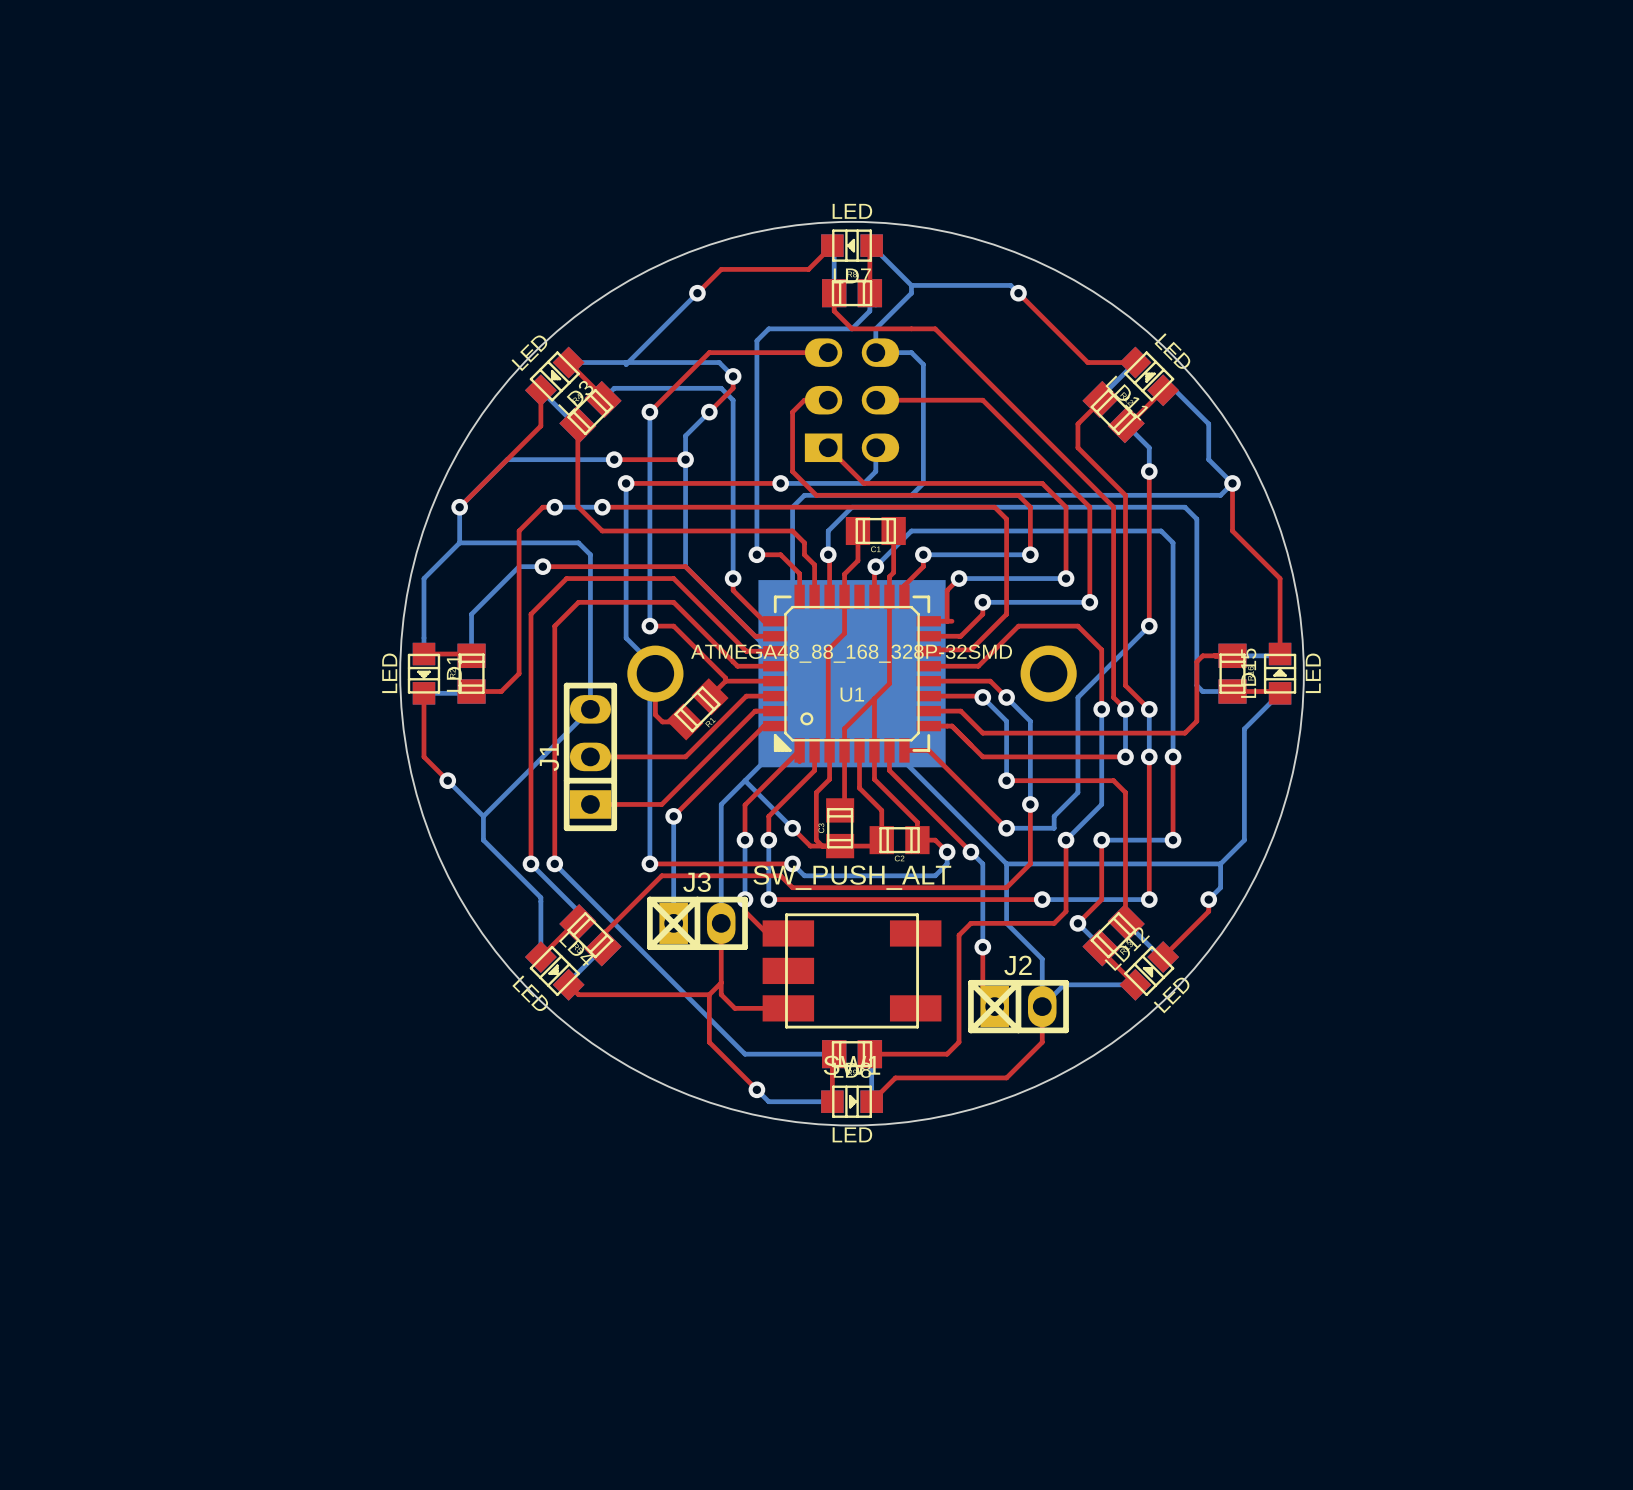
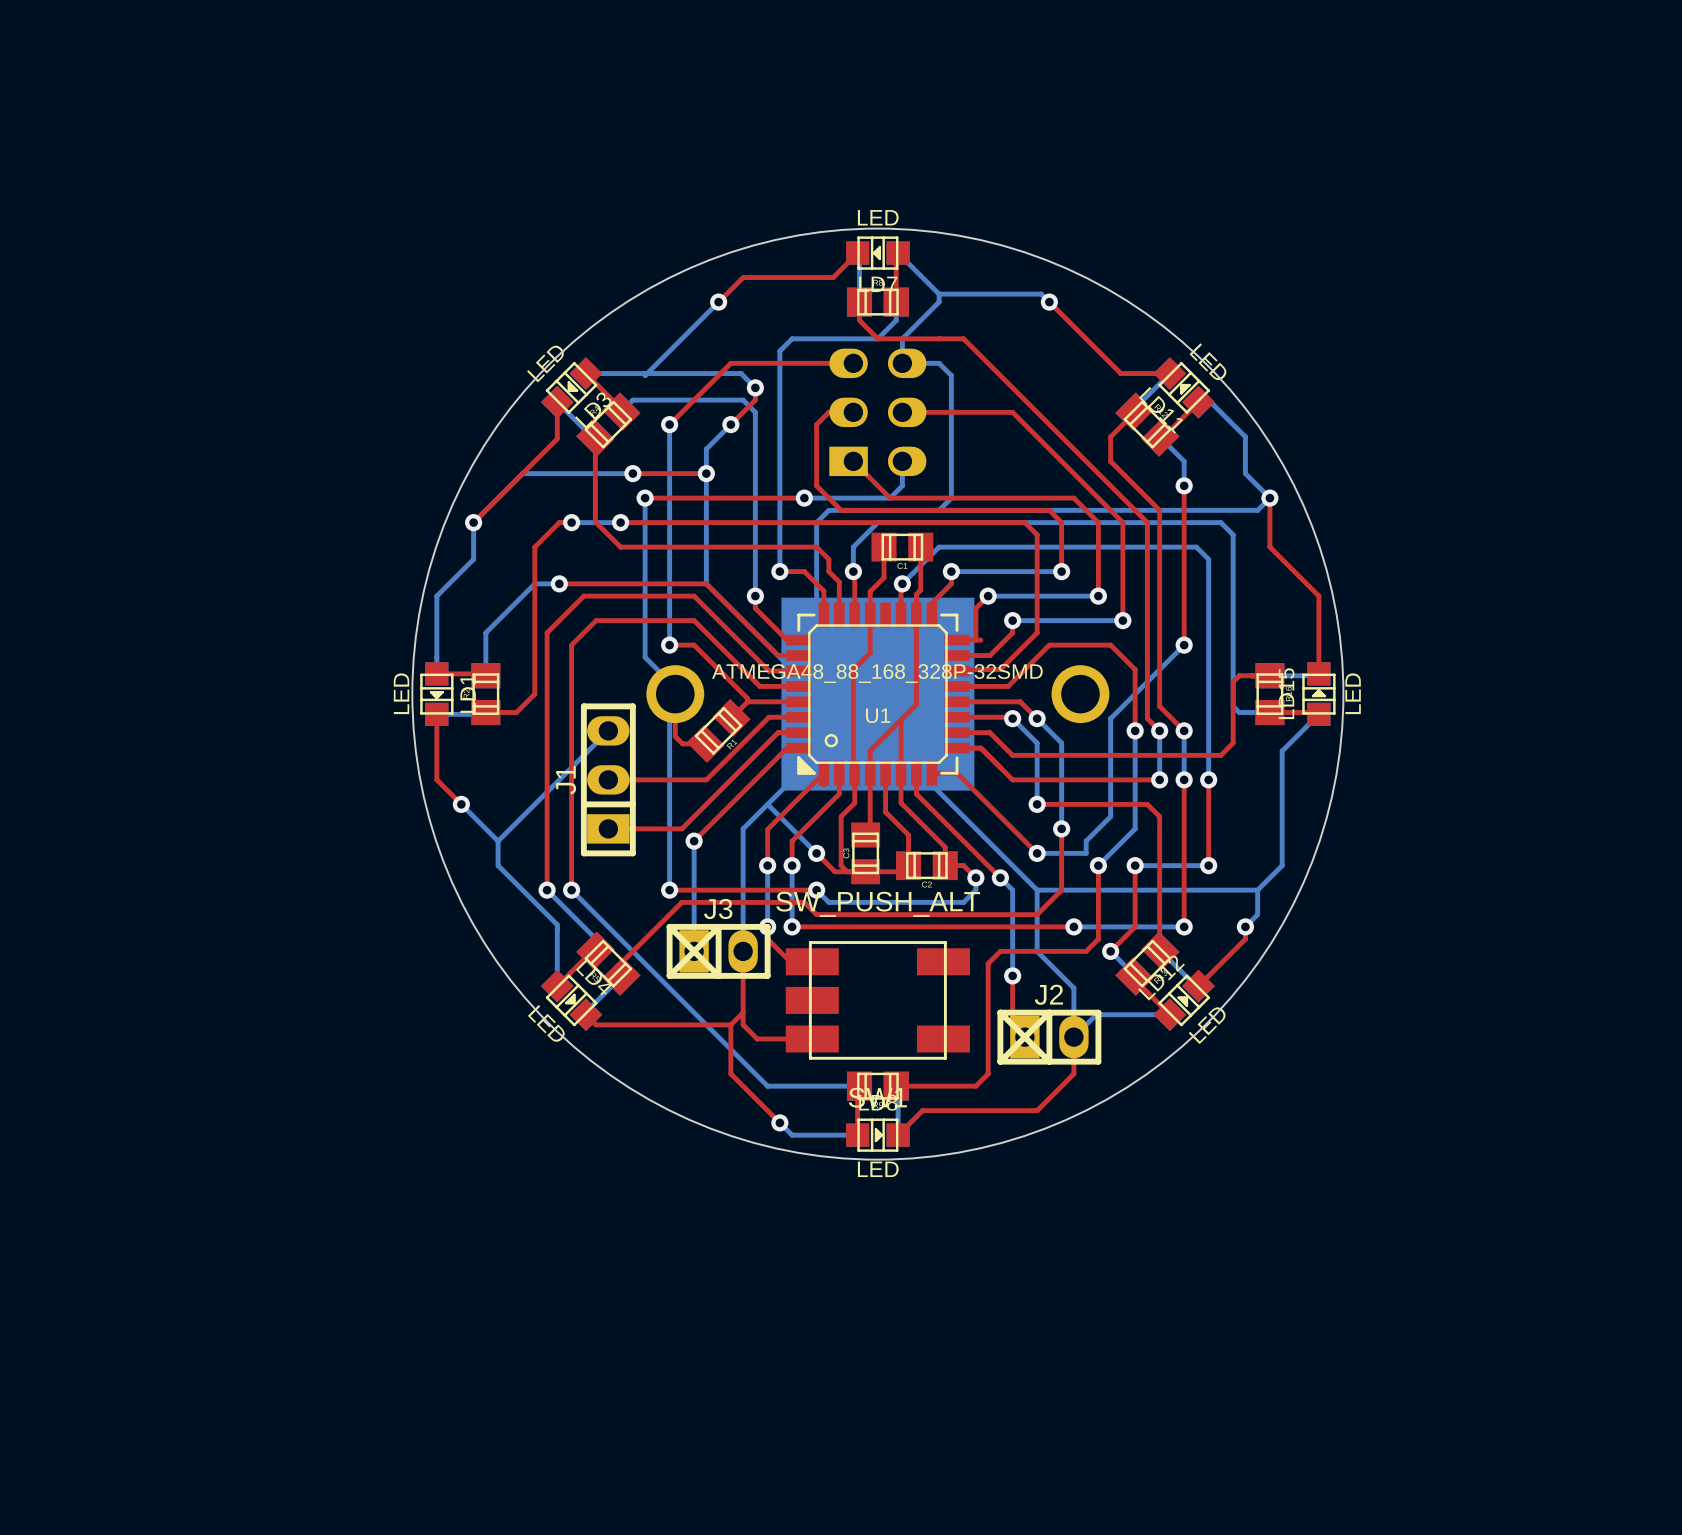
bottom track: (459, 542) (578, 542) (590, 554) (590, 709) -> none

